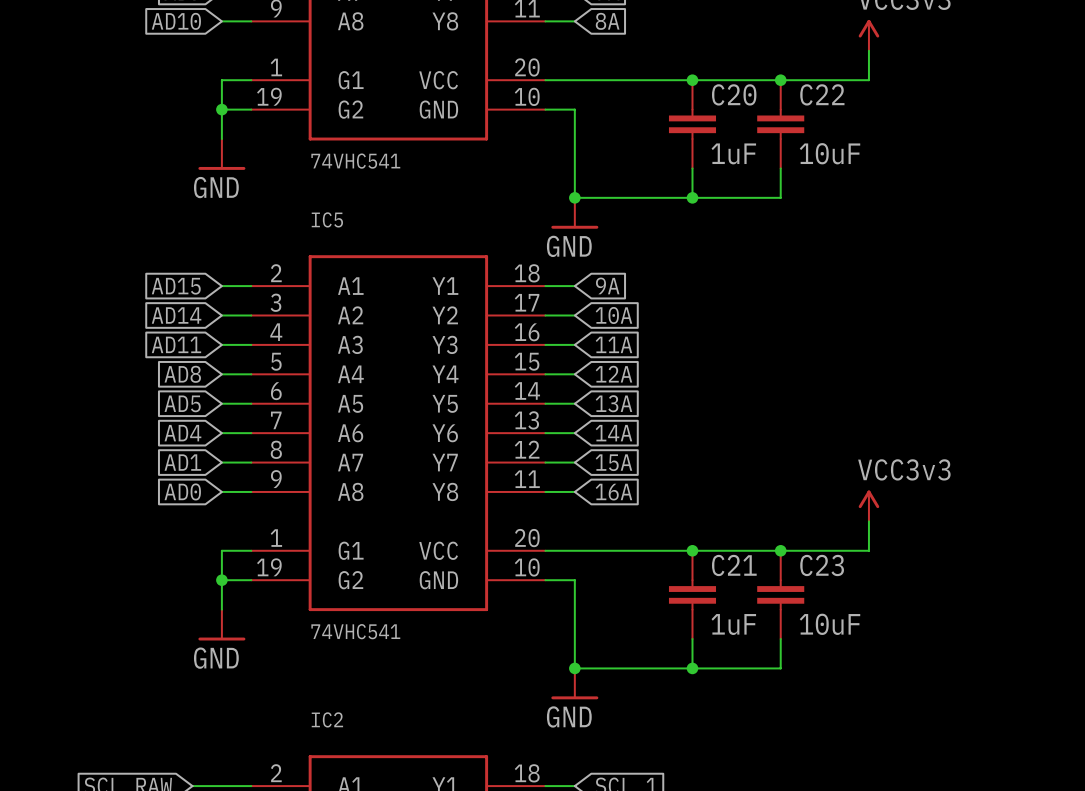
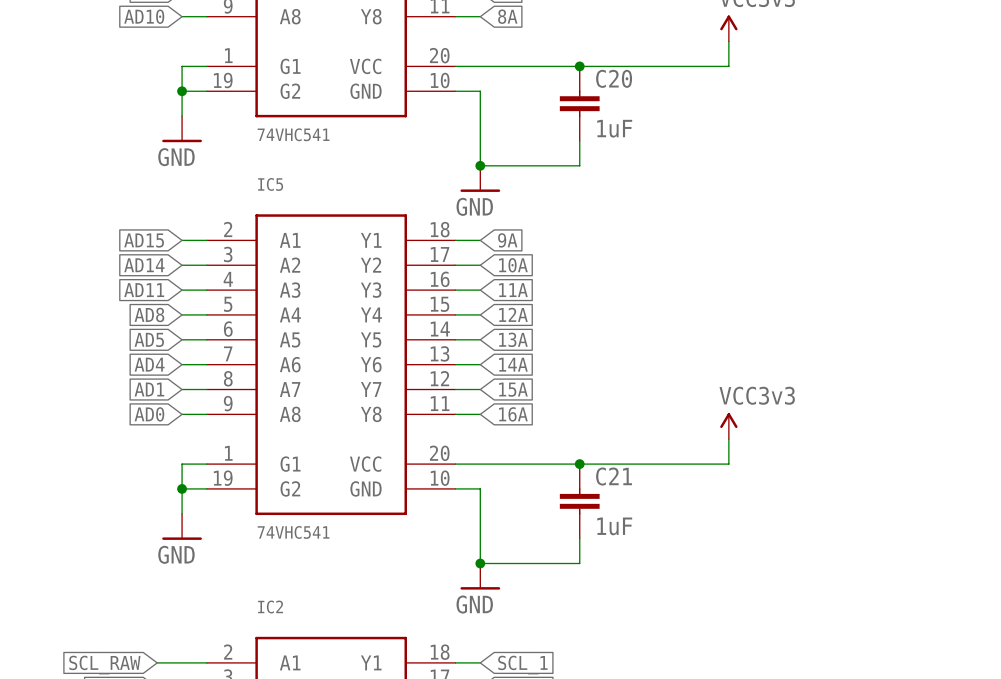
junction: (780, 80) -> none
C22: 10uF (780, 124) -> none
wire: (780, 168) (780, 197) (692, 197) -> none
junction: (692, 197) -> none
junction: (780, 550) -> none
C23: 10uF (780, 594) -> none
wire: (780, 639) (780, 668) (692, 668) -> none
junction: (692, 668) -> none

